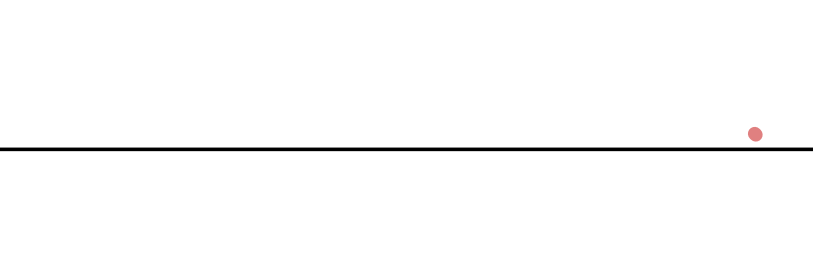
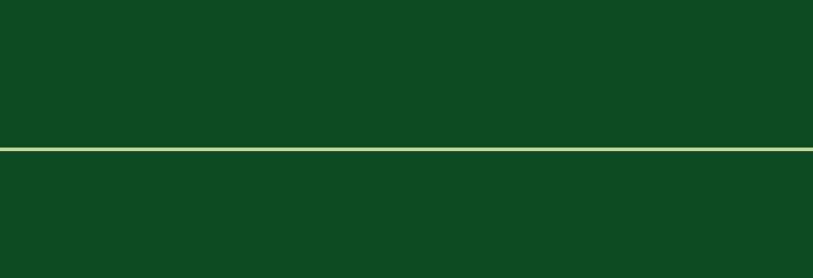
track: (754, 133) (755, 134) -> none

